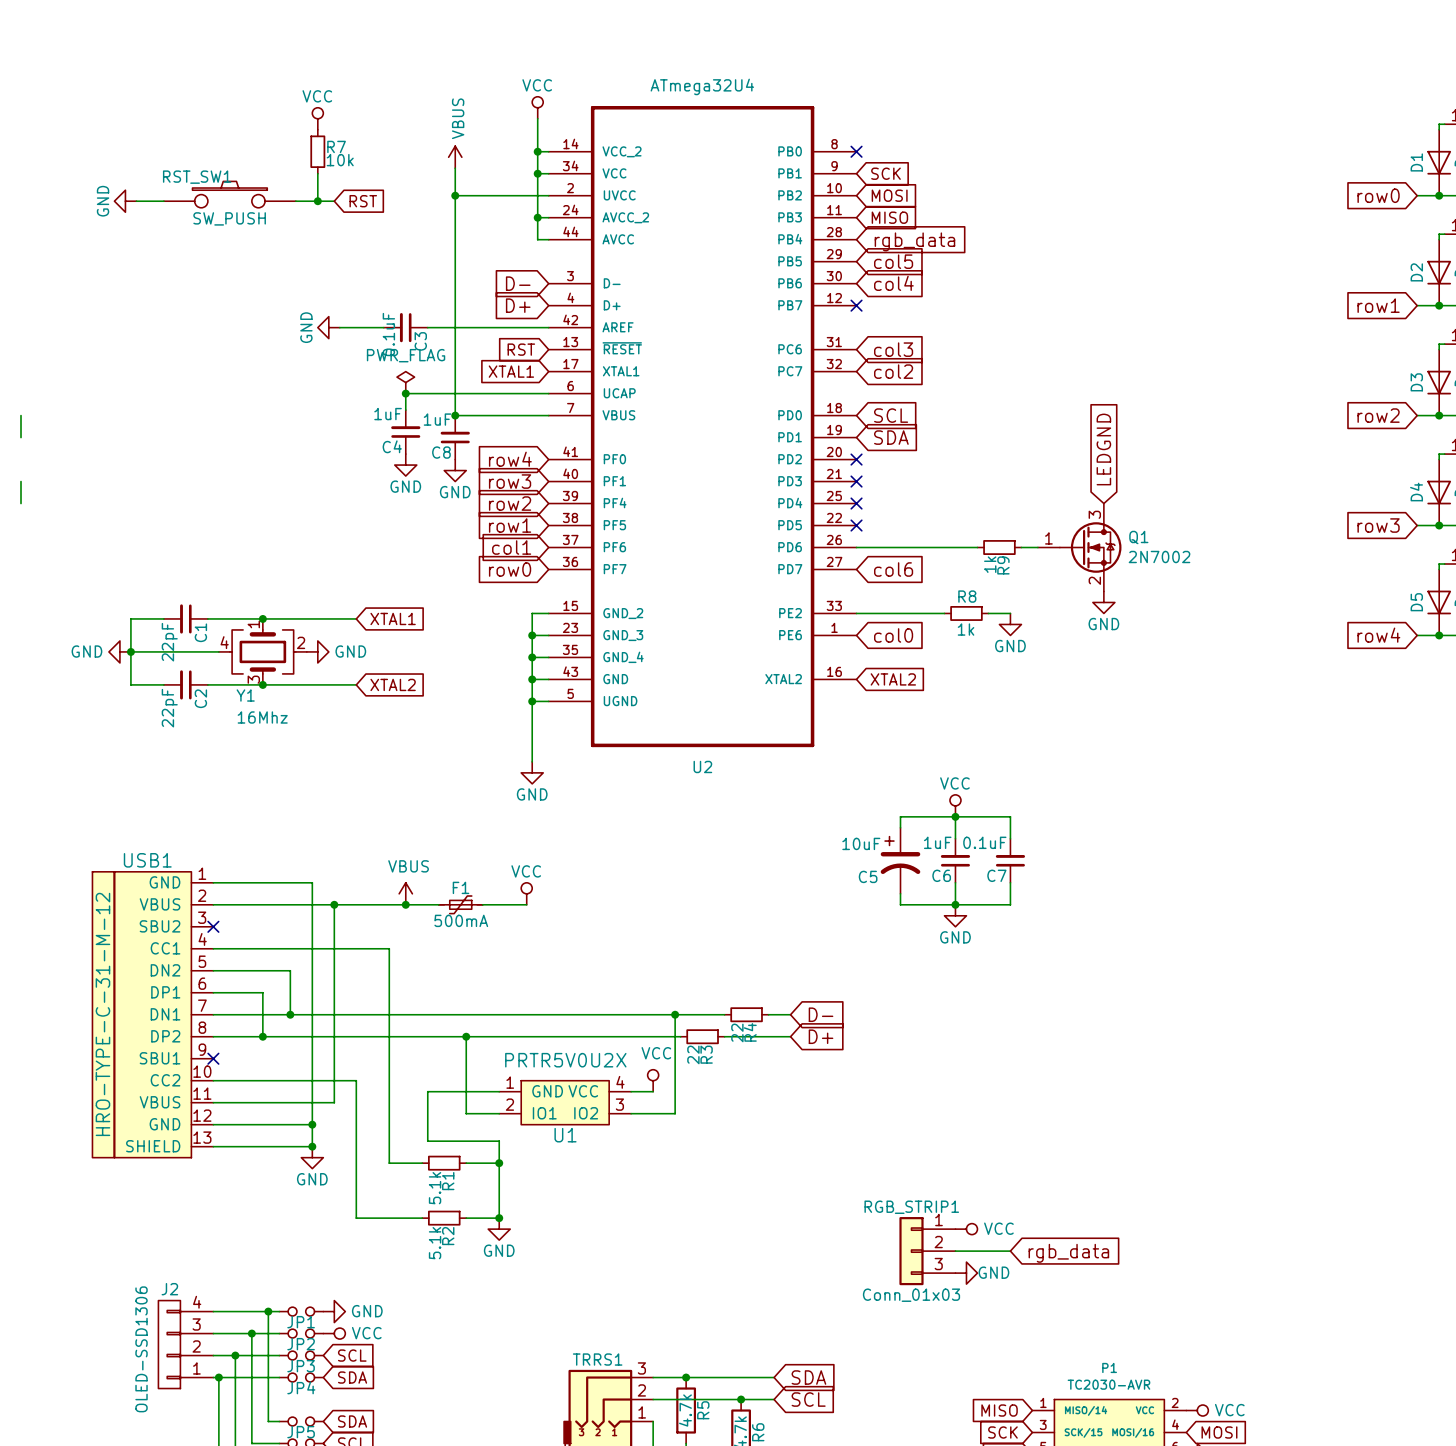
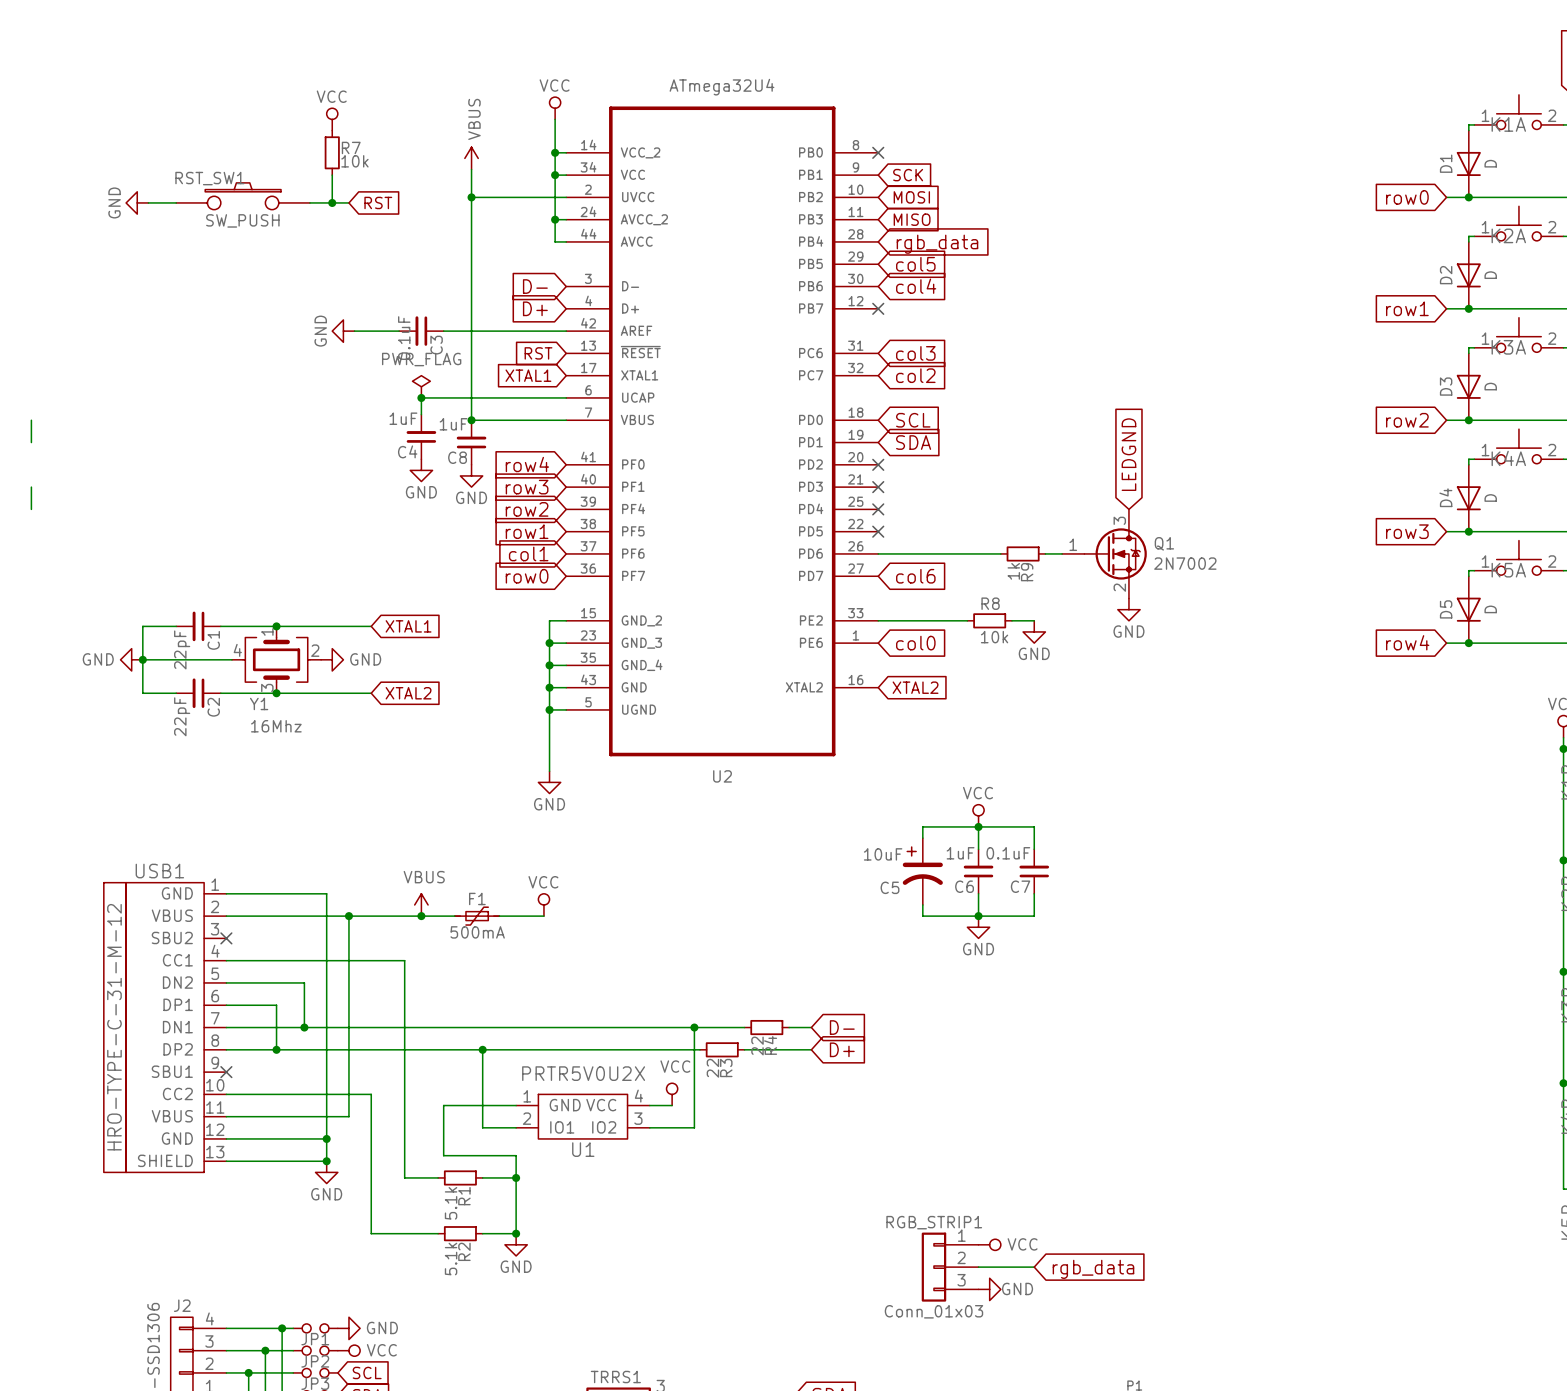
R8 value: 1k (966, 629) -> 10k (994, 637)

